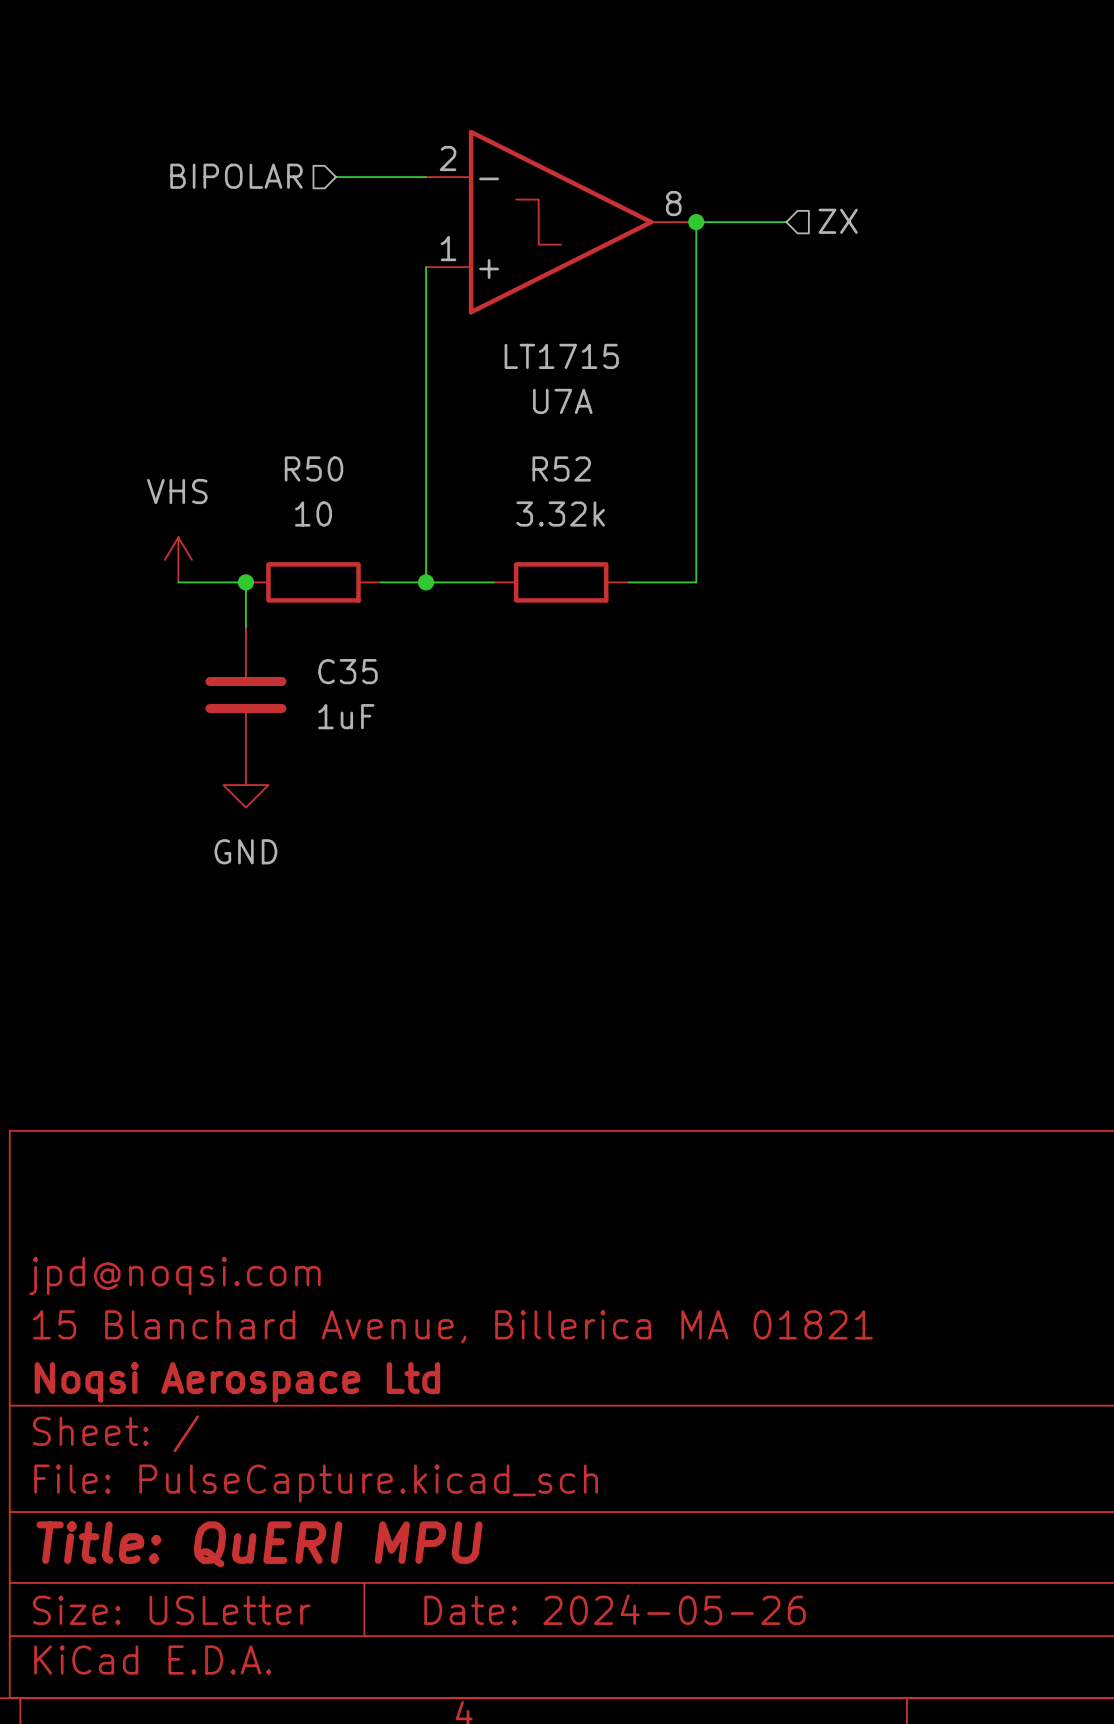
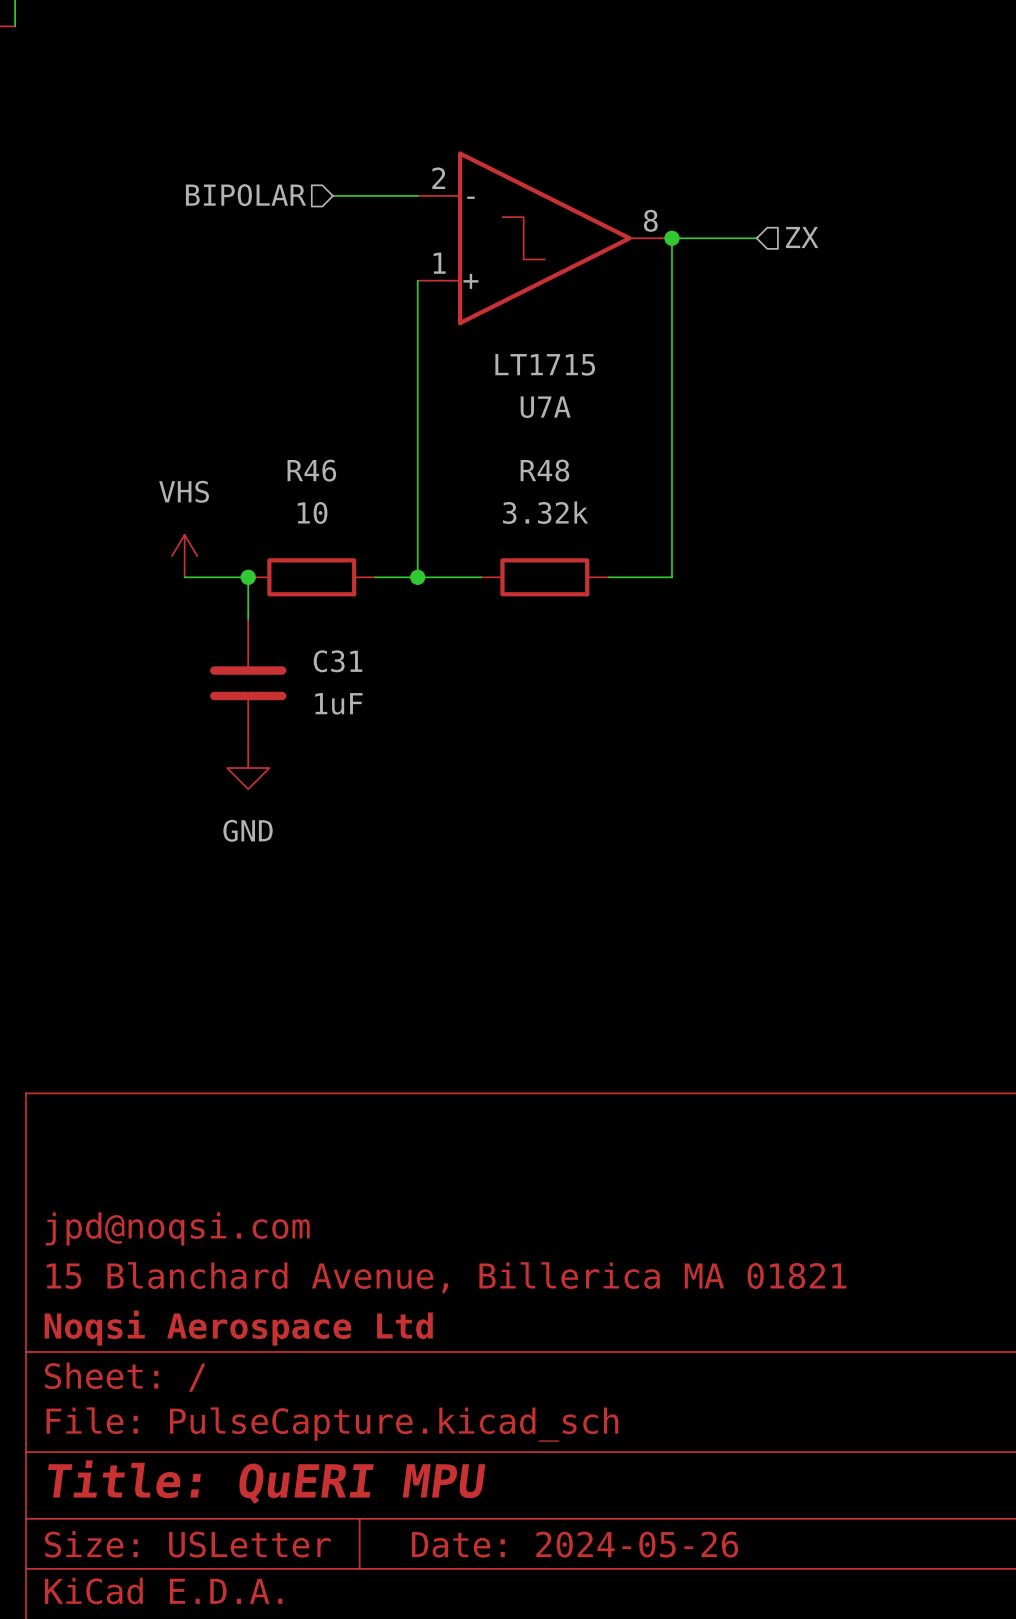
R50 name: R50 (314, 468) -> R46 (311, 470)
R52 name: R52 (561, 468) -> R48 (544, 470)
C35 name: C35 (347, 671) -> C31 (338, 661)

